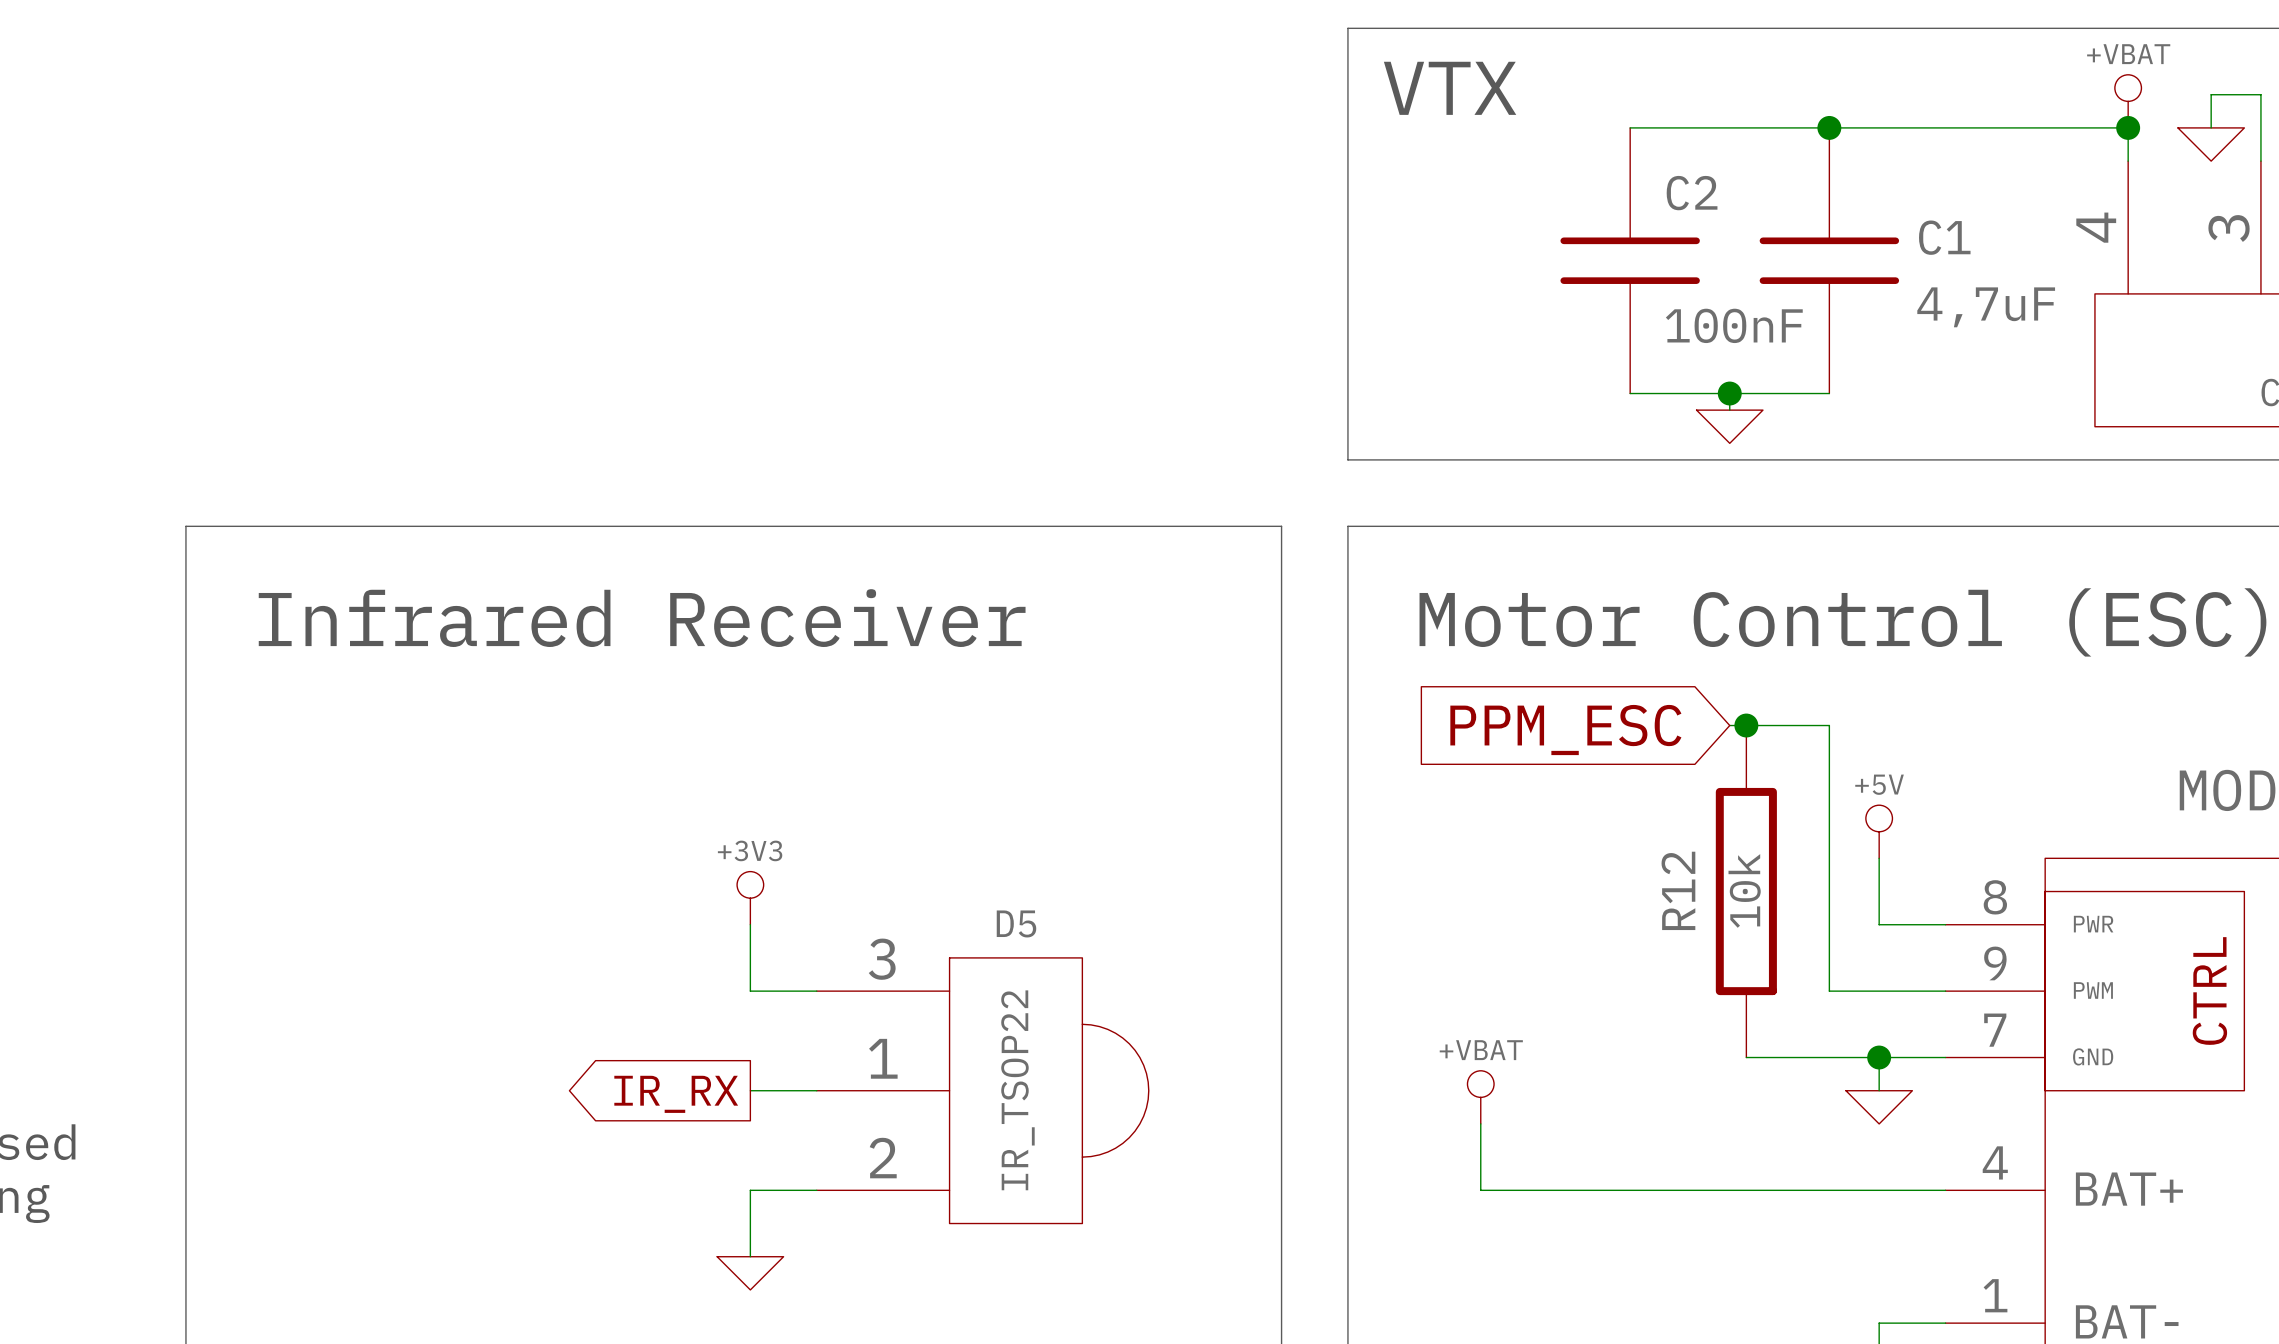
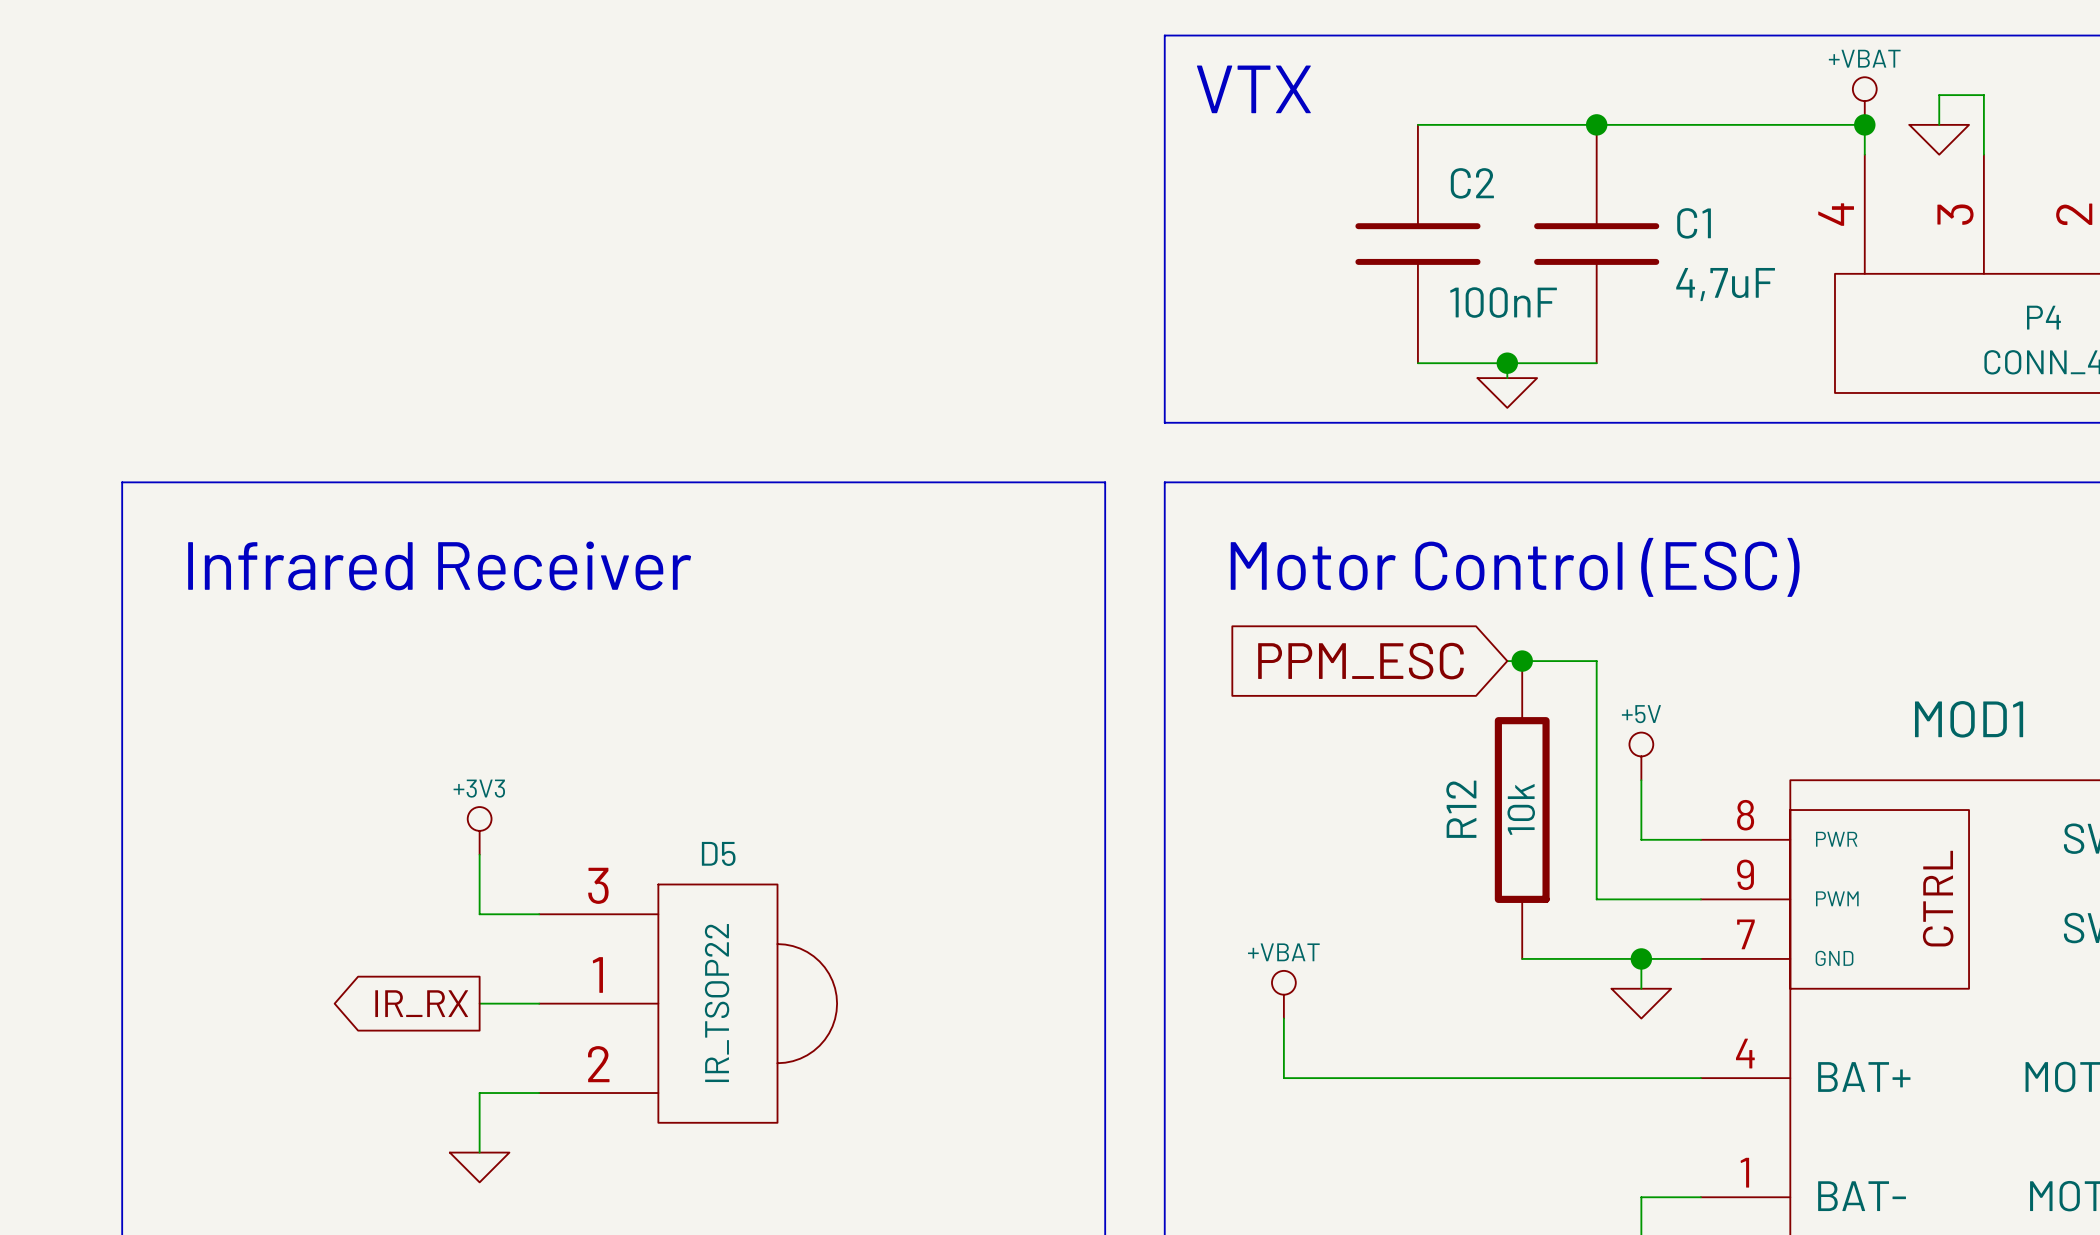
power symbol position: +3V3 (750, 898) -> +3V3 (479, 830)
wire: (750, 924) (750, 991) (816, 991) -> (479, 854) (479, 914) (539, 914)
wire: (750, 1090) (816, 1090) -> (479, 1003) (539, 1003)
D5 position: (982, 1090) -> (688, 1003)
global label position: IR_RX (676, 1094) -> IR_RX (421, 1003)
wire: (816, 1190) (750, 1190) (750, 1256) -> (539, 1093) (479, 1093) (479, 1152)
power symbol position: (750, 1273) -> (479, 1167)

